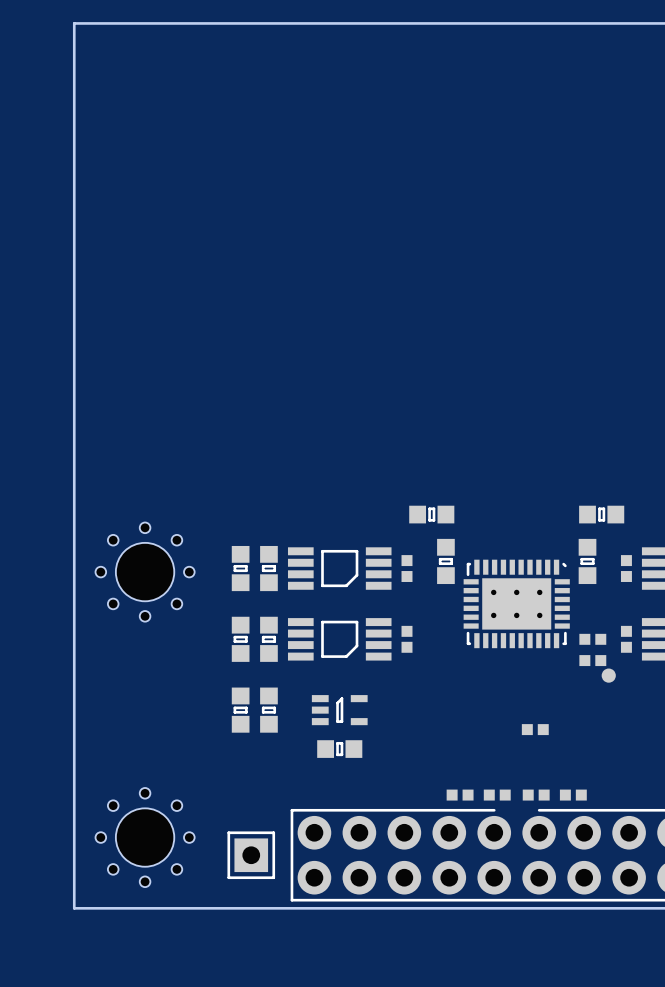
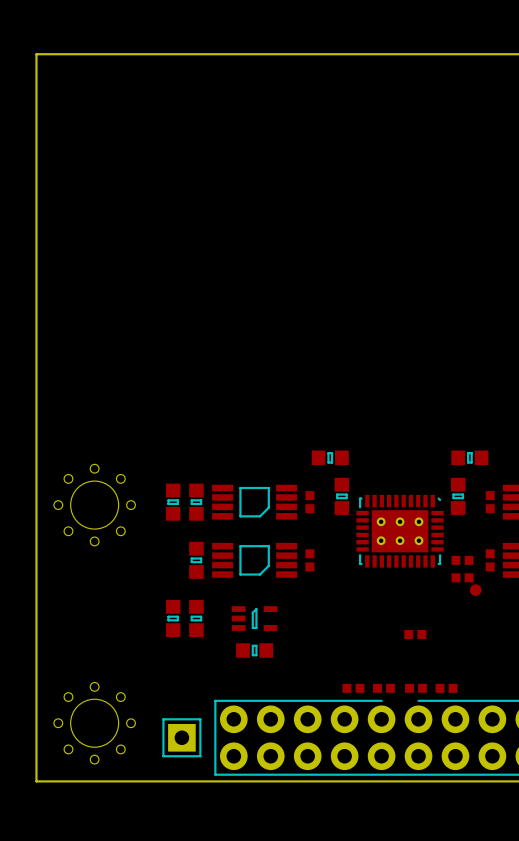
part: (240, 639) -> none

